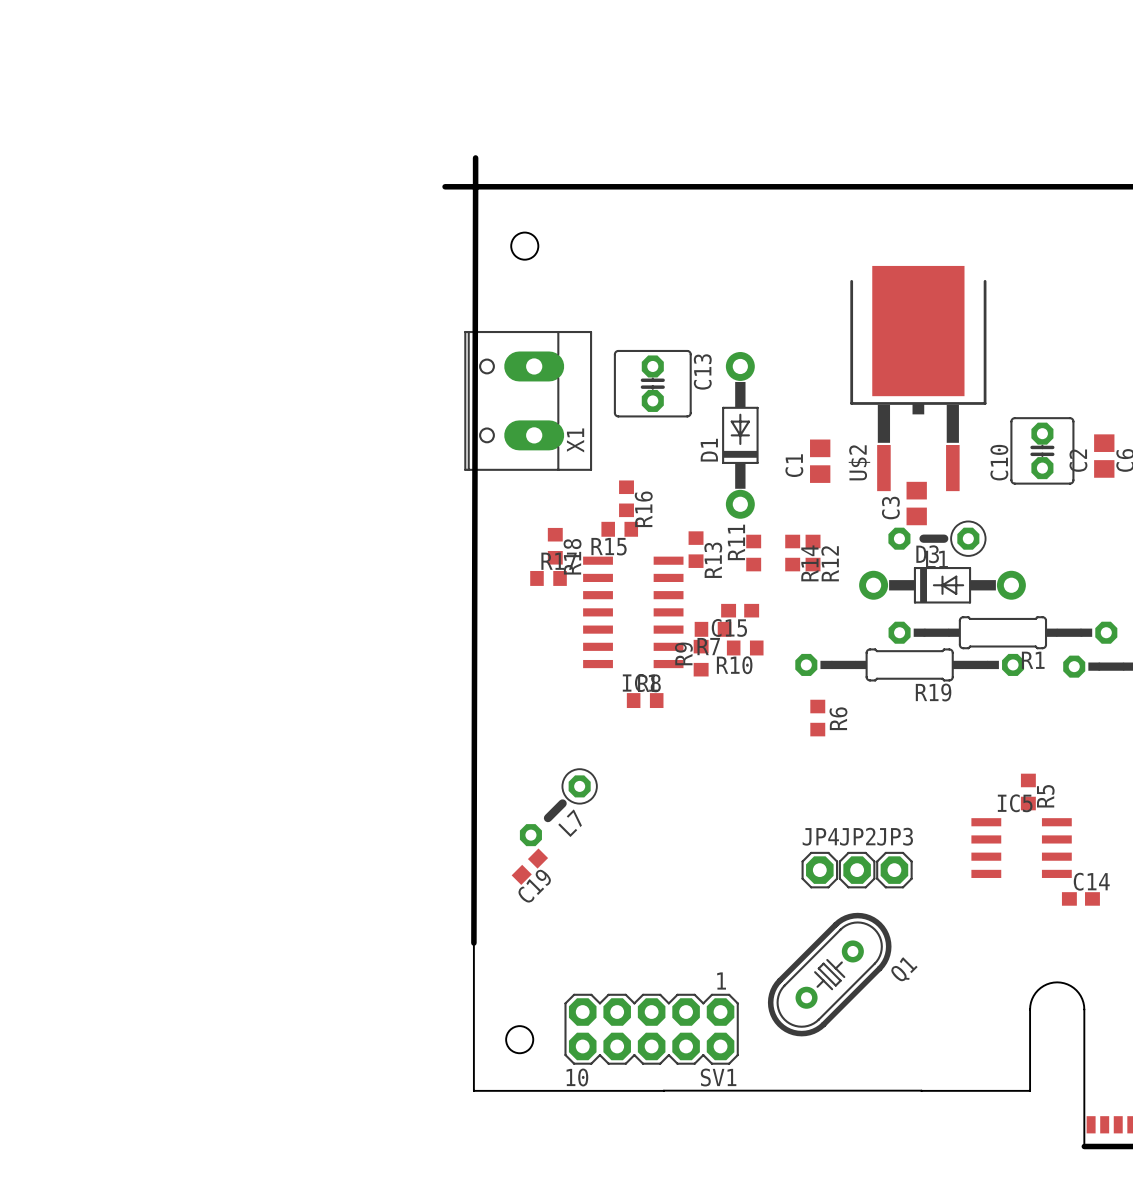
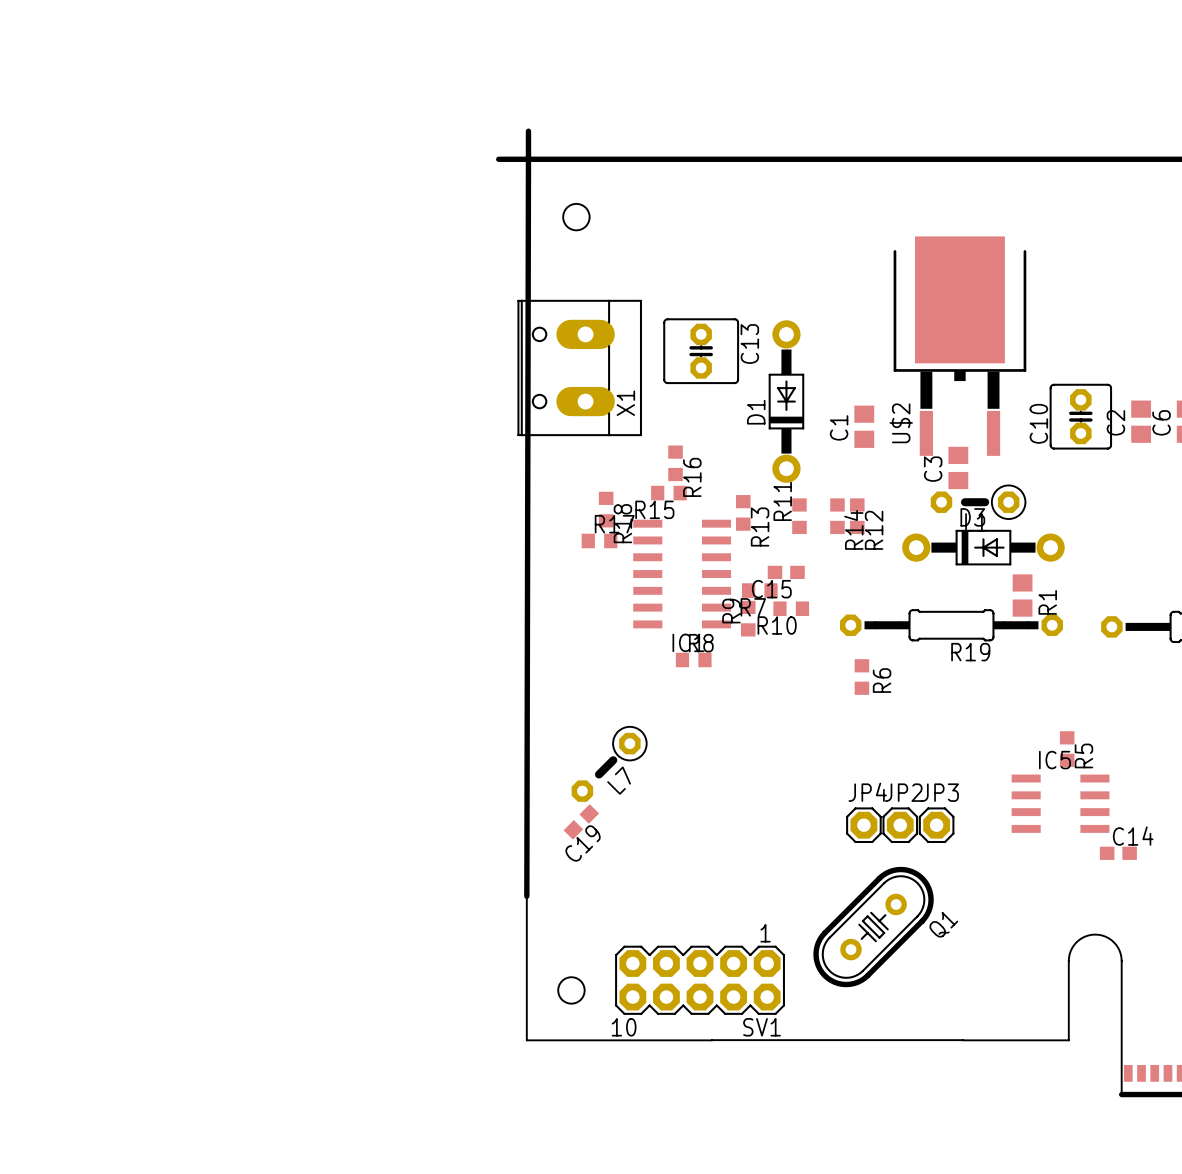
R1 footprint: [888, 616, 1118, 650] -> [1012, 574, 1033, 617]

